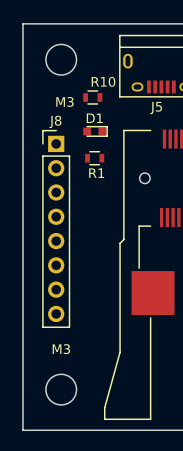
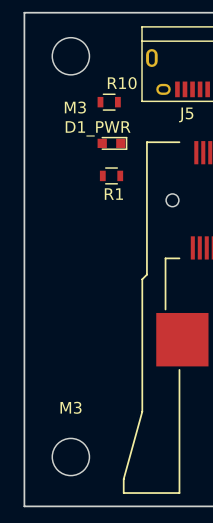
D1 name: D1 (94, 118) -> D1_PWR (98, 128)
J8: (56, 228) -> none

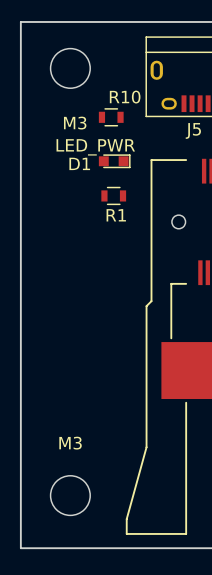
D1_PWR name: D1_PWR (98, 128) -> D1 (79, 163)
D1_PWR value: none -> LED_PWR (95, 147)

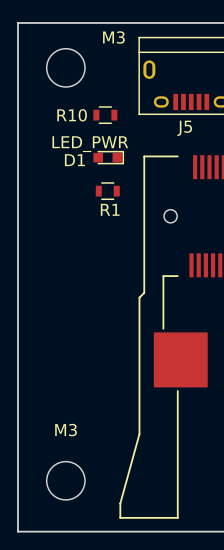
R10 name position: R10 (125, 97) -> R10 (72, 115)
M3 name position: M3 (75, 123) -> M3 (113, 37)

